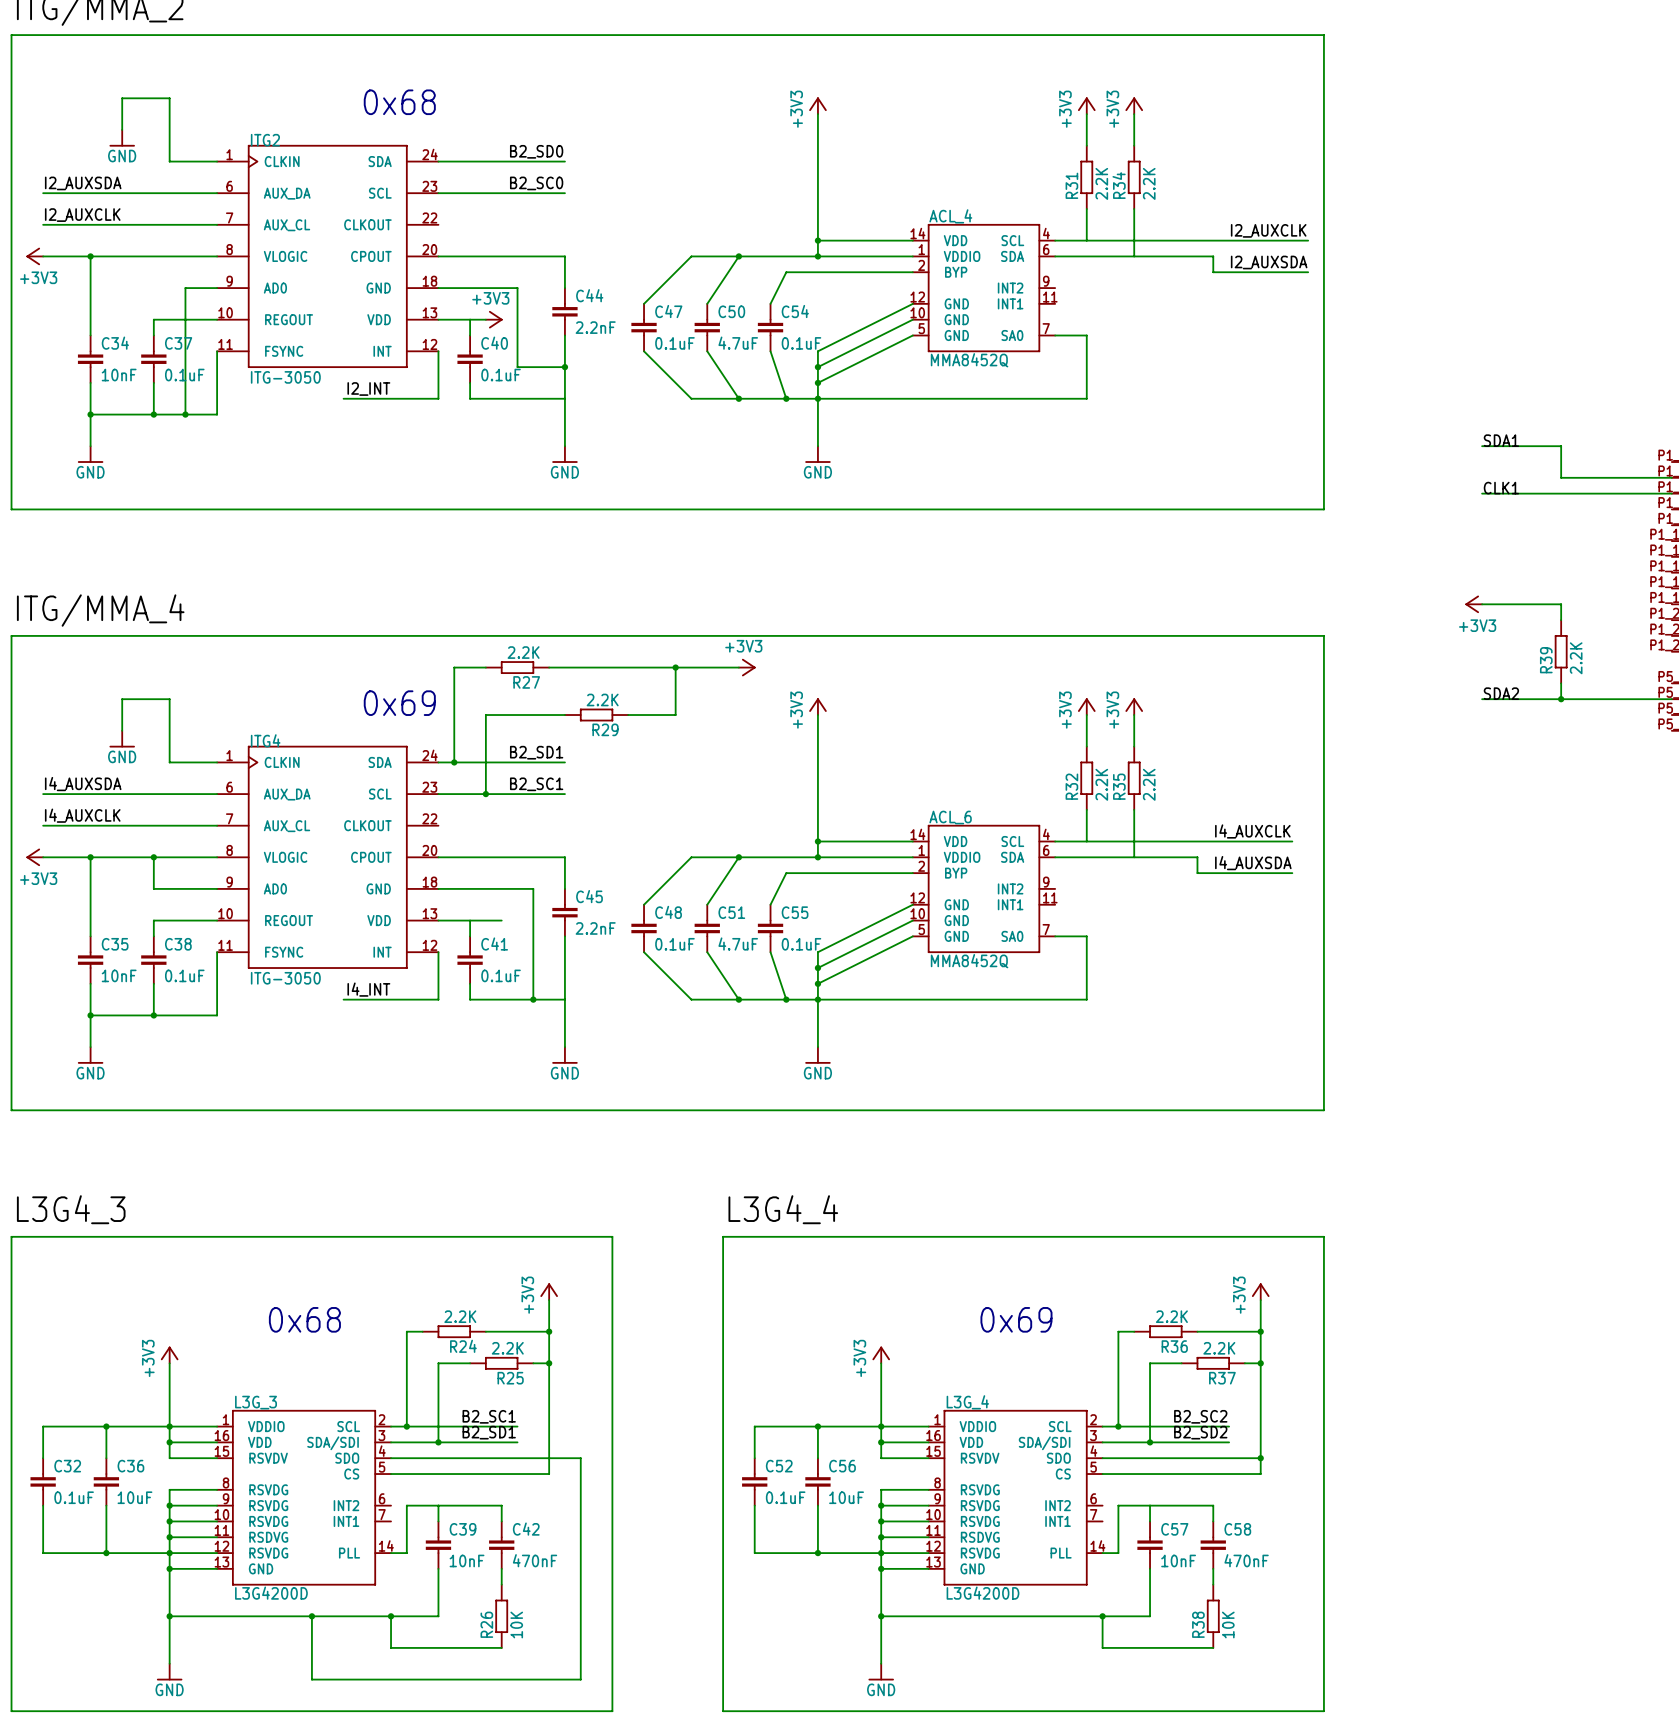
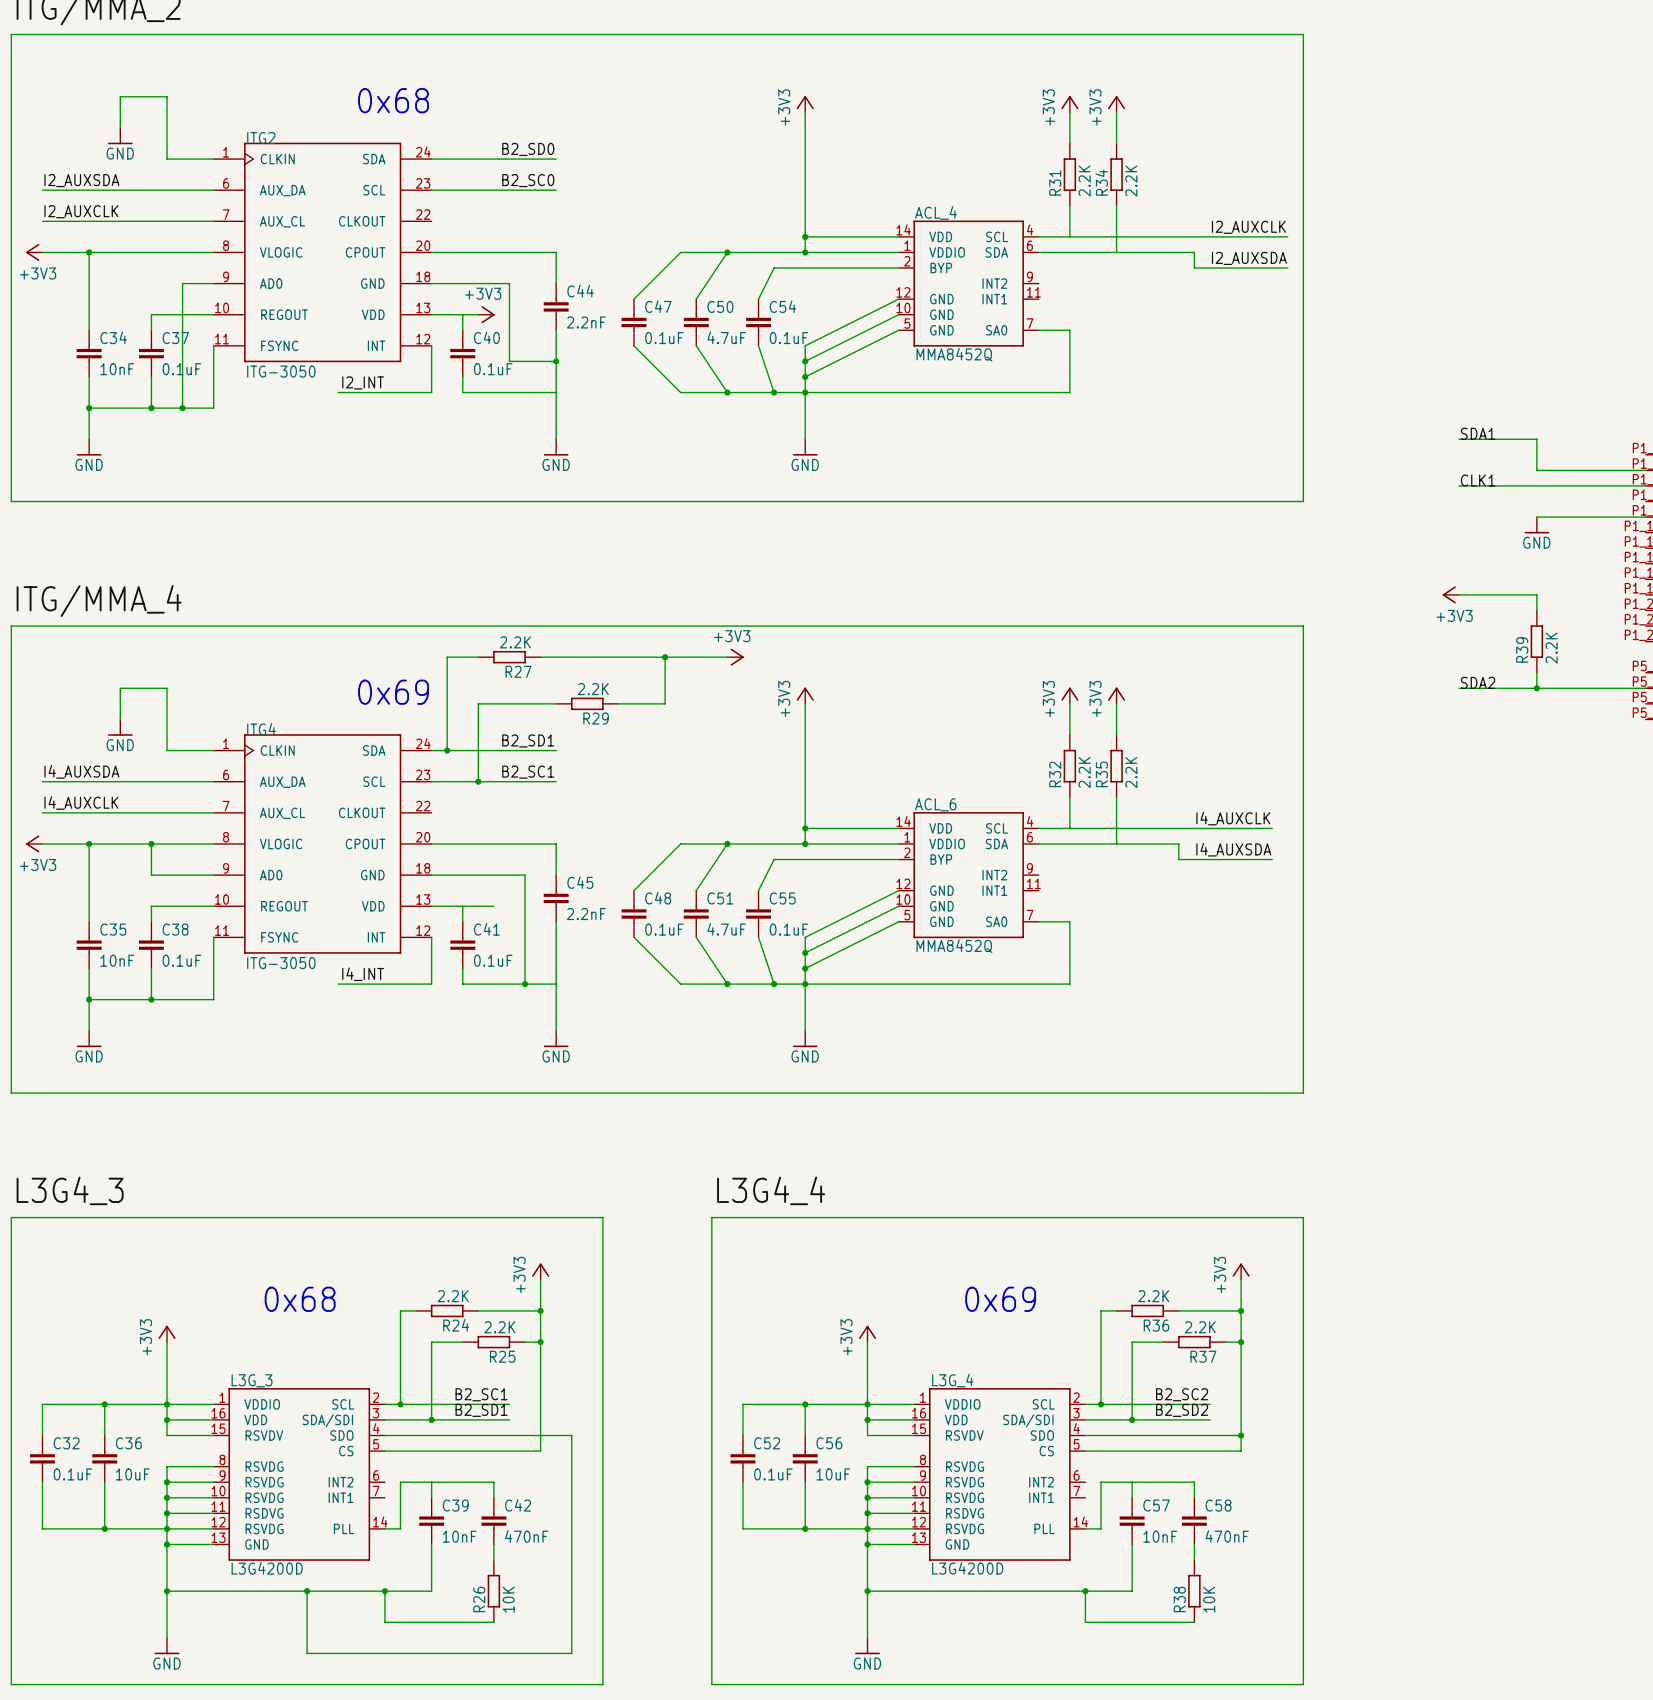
wire: none -> (1536, 517) (1645, 517)
power symbol: none -> GND (1536, 525)

